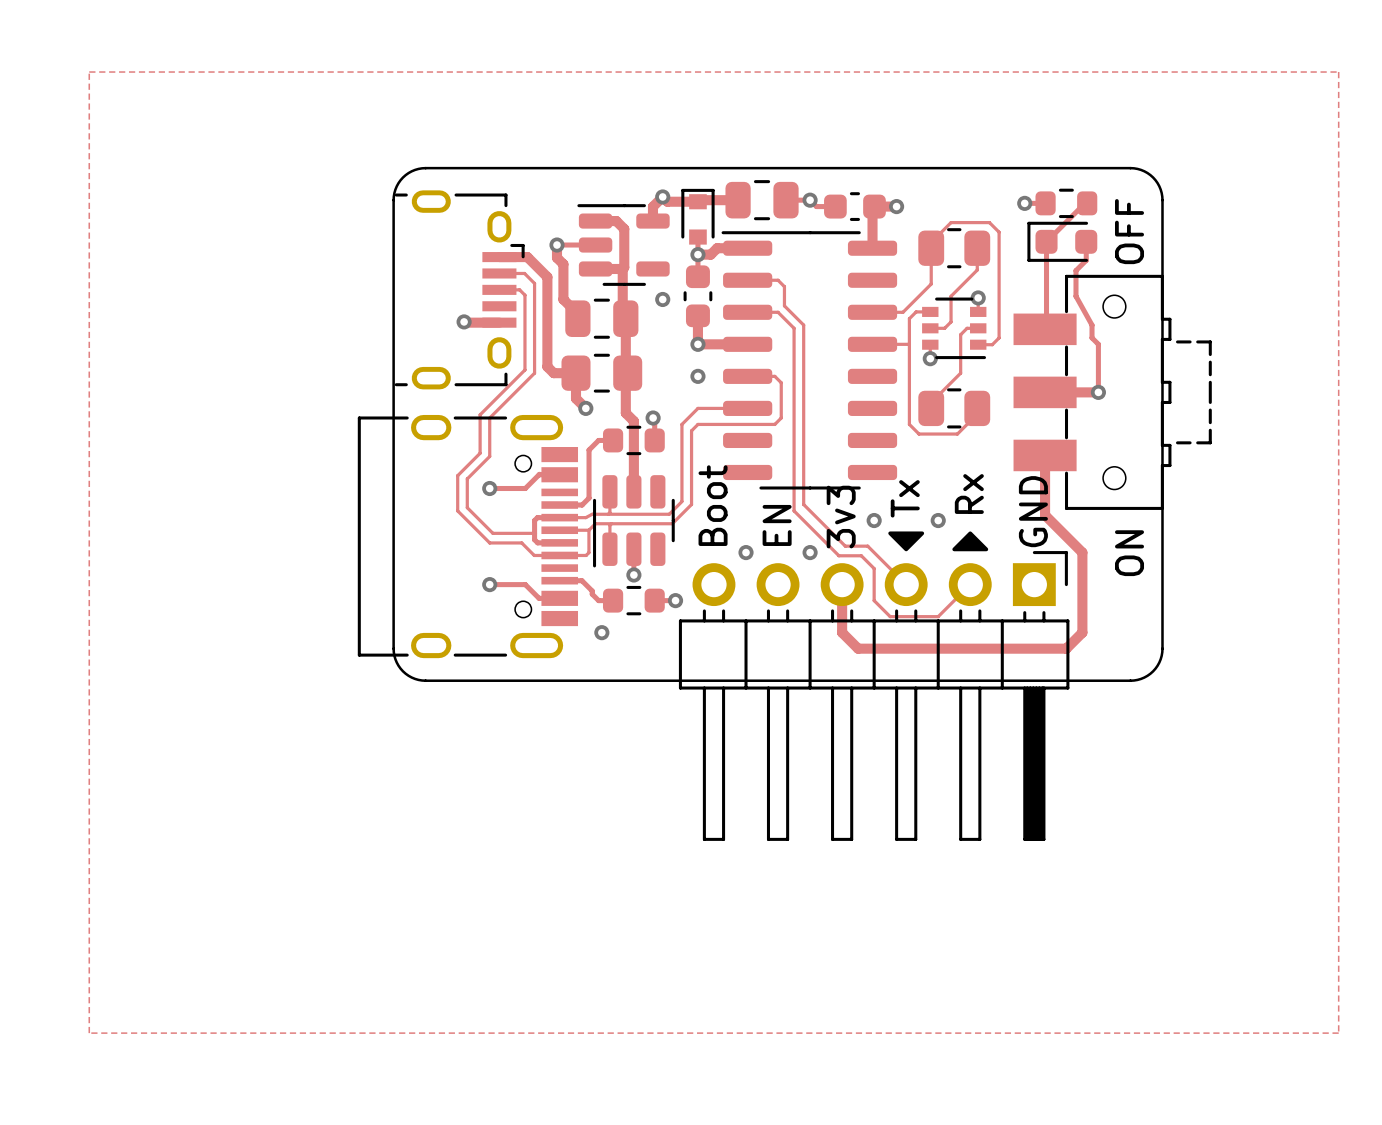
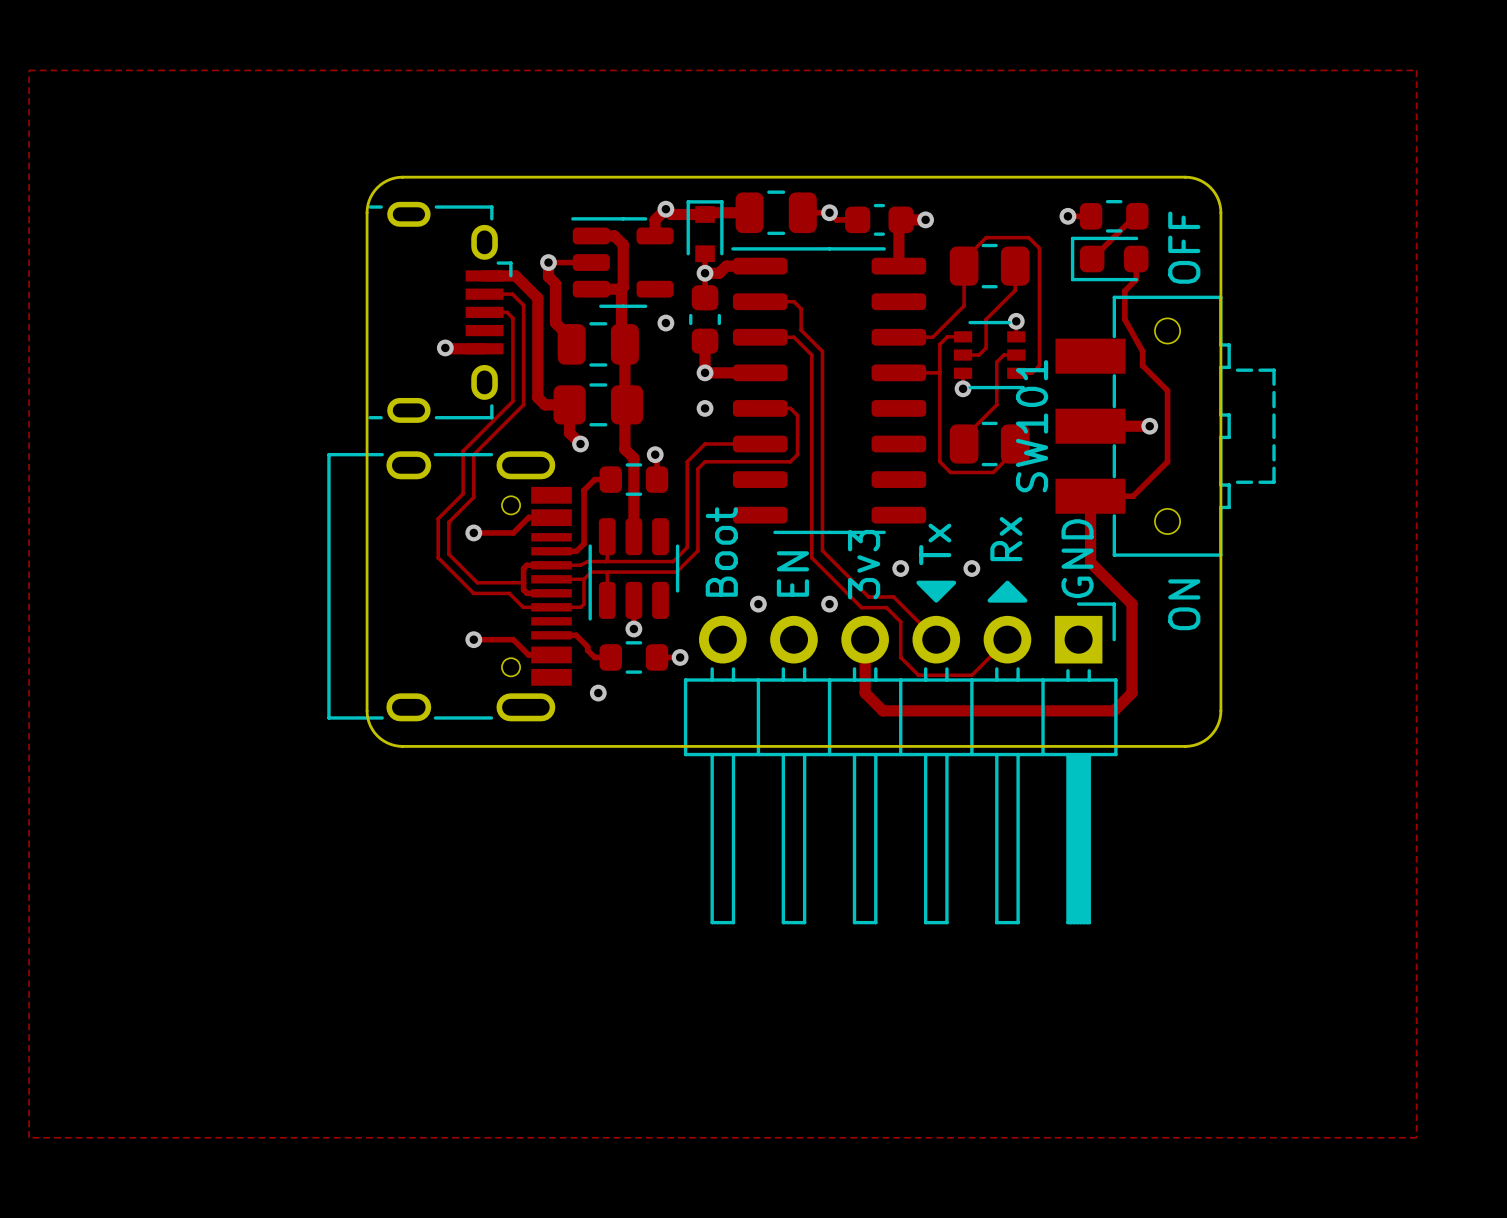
track: (1046, 241) (1045, 329) -> none
track: (1098, 344) (1098, 392) -> (1149, 372) (1167, 390) (1167, 461) (1133, 496) (1090, 496)
SW101 name: none -> SW101 (1032, 426)

